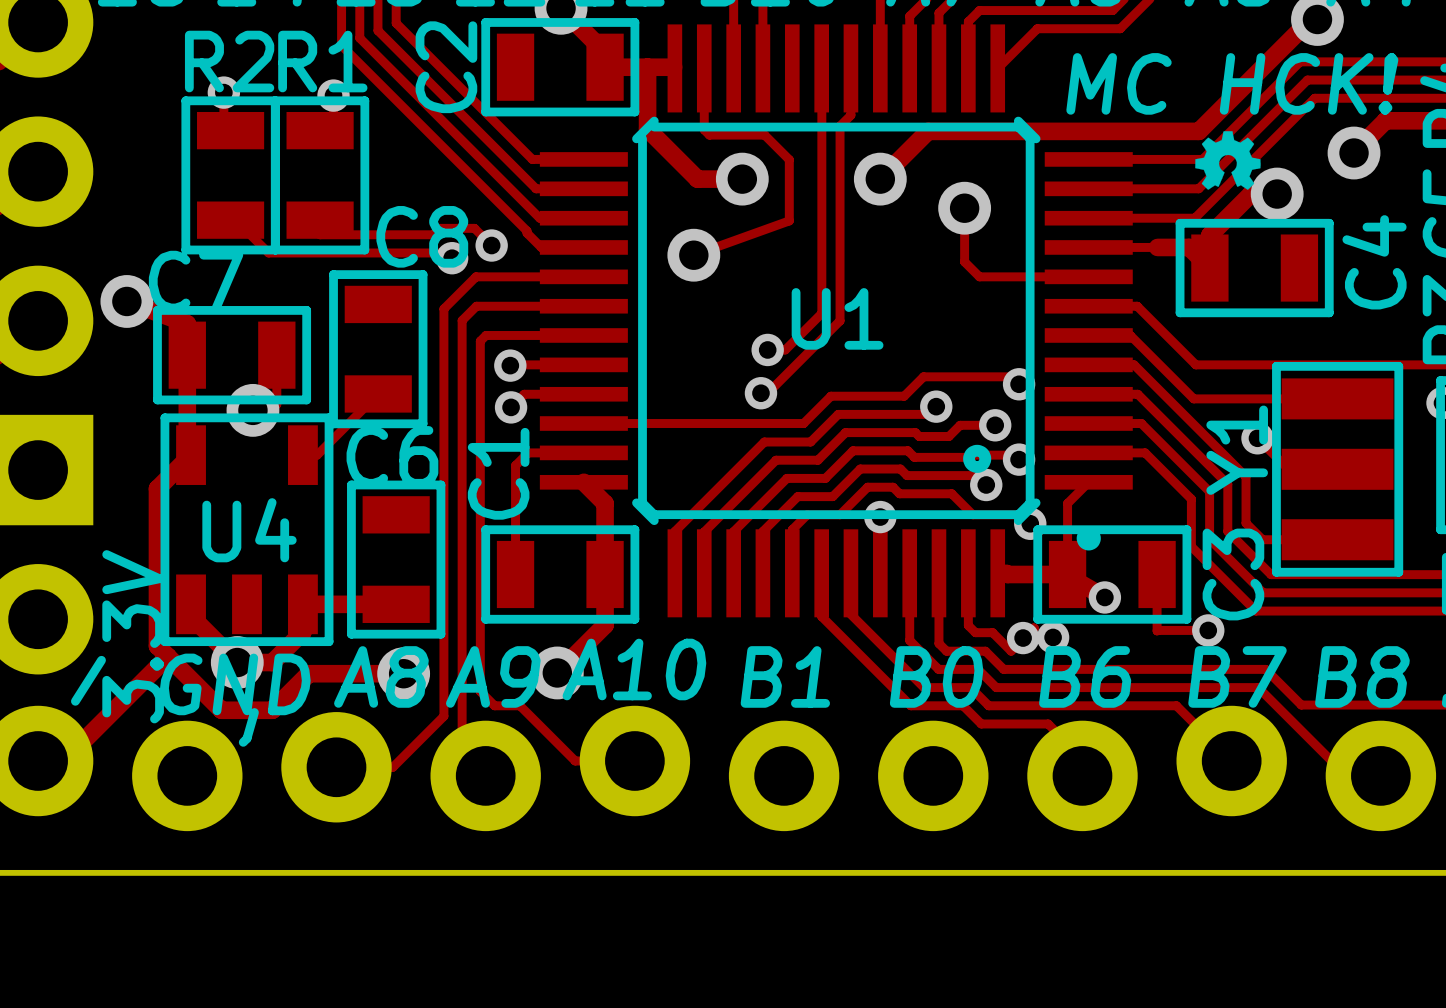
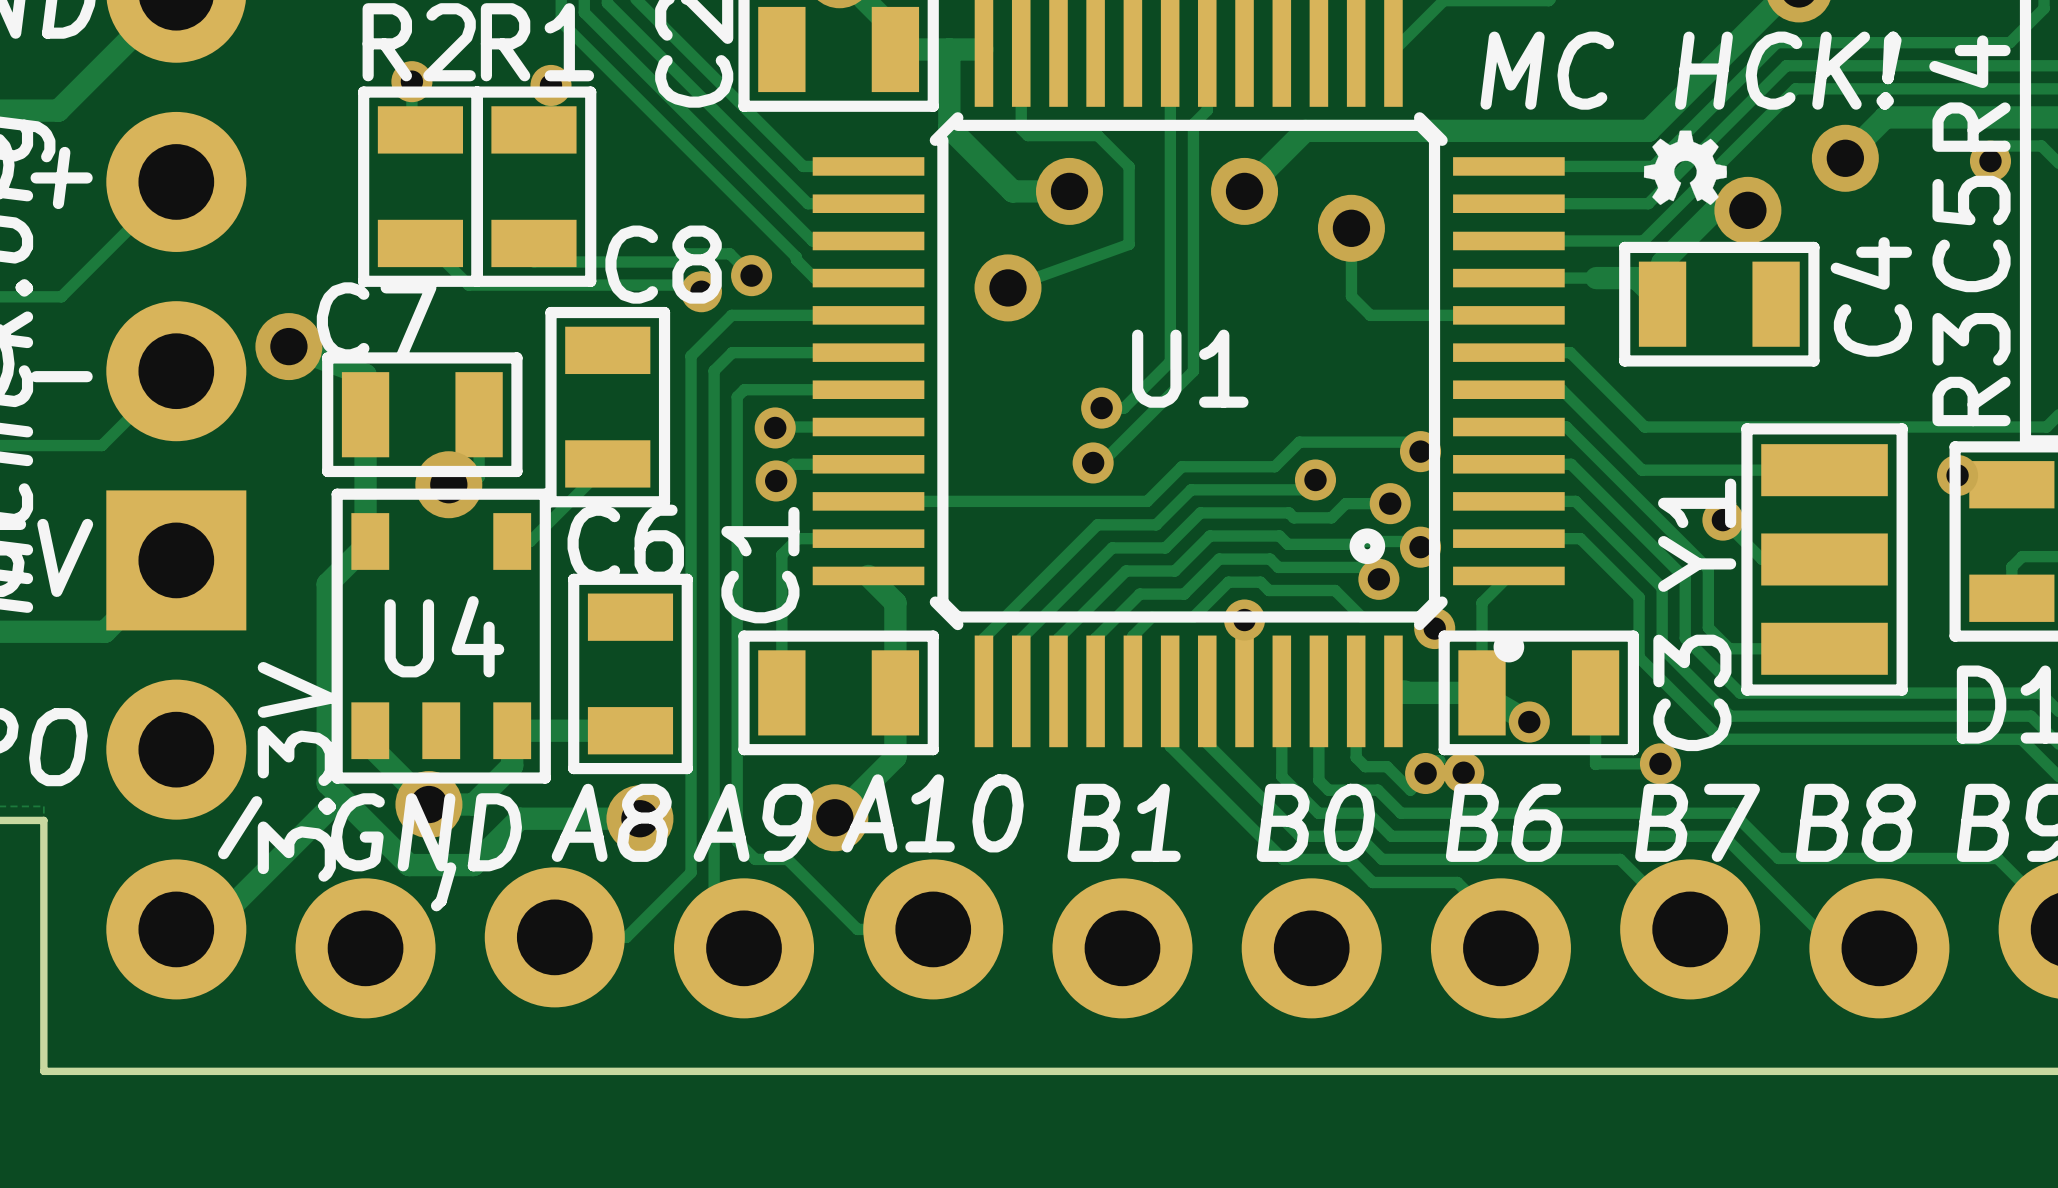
Y1 footprint: [1272, 361, 1404, 577] -> [1741, 423, 1908, 696]
U4 footprint: [160, 413, 334, 647] -> [331, 488, 551, 784]

